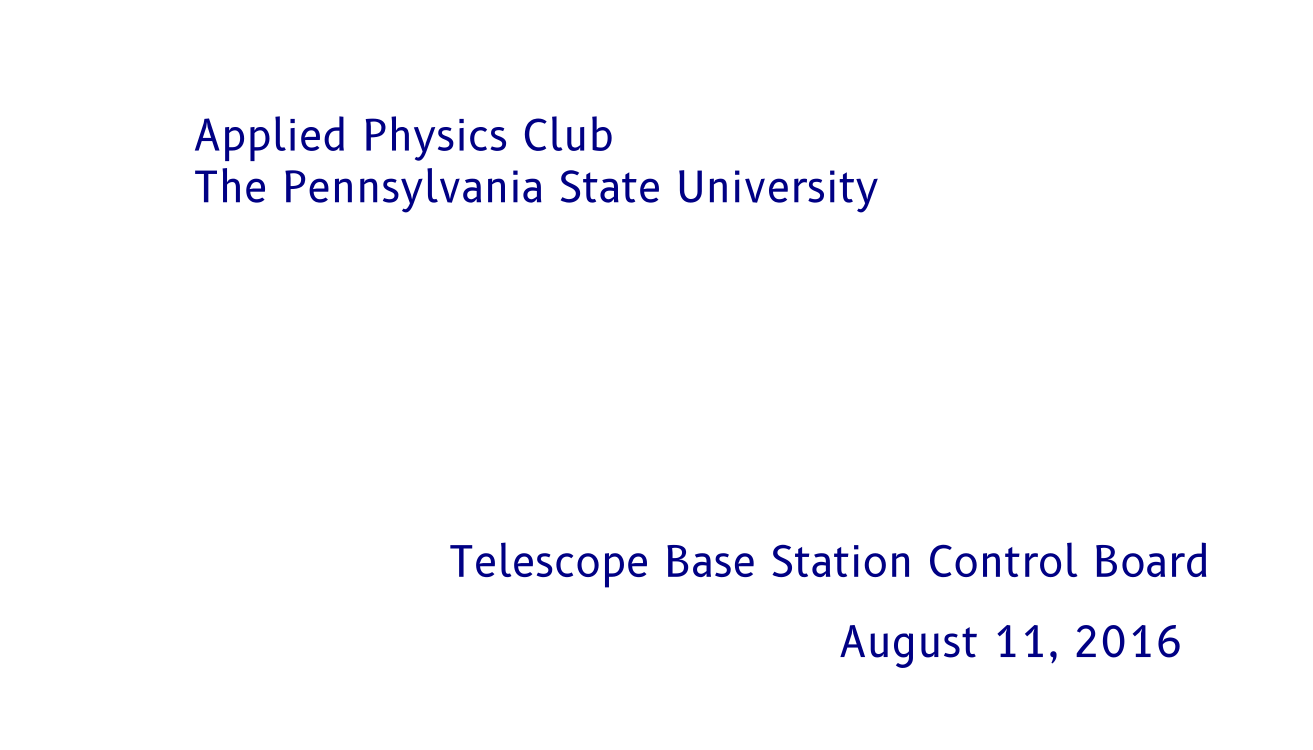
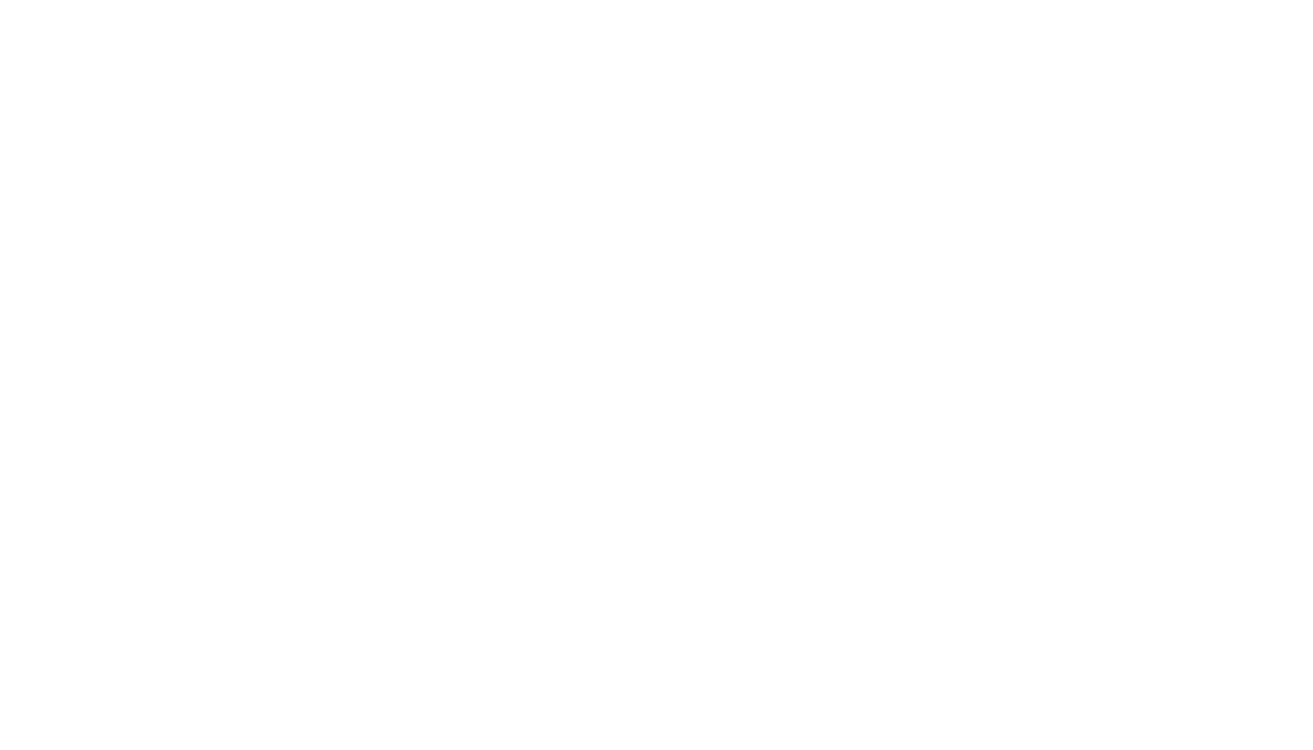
text: Applied Physics Club (403, 138) -> none
text: The Pennsylvania State University (536, 190) -> none
text: Telescope Base Station Control Board (828, 564) -> none
text: August 11, 2016 (1010, 646) -> none

